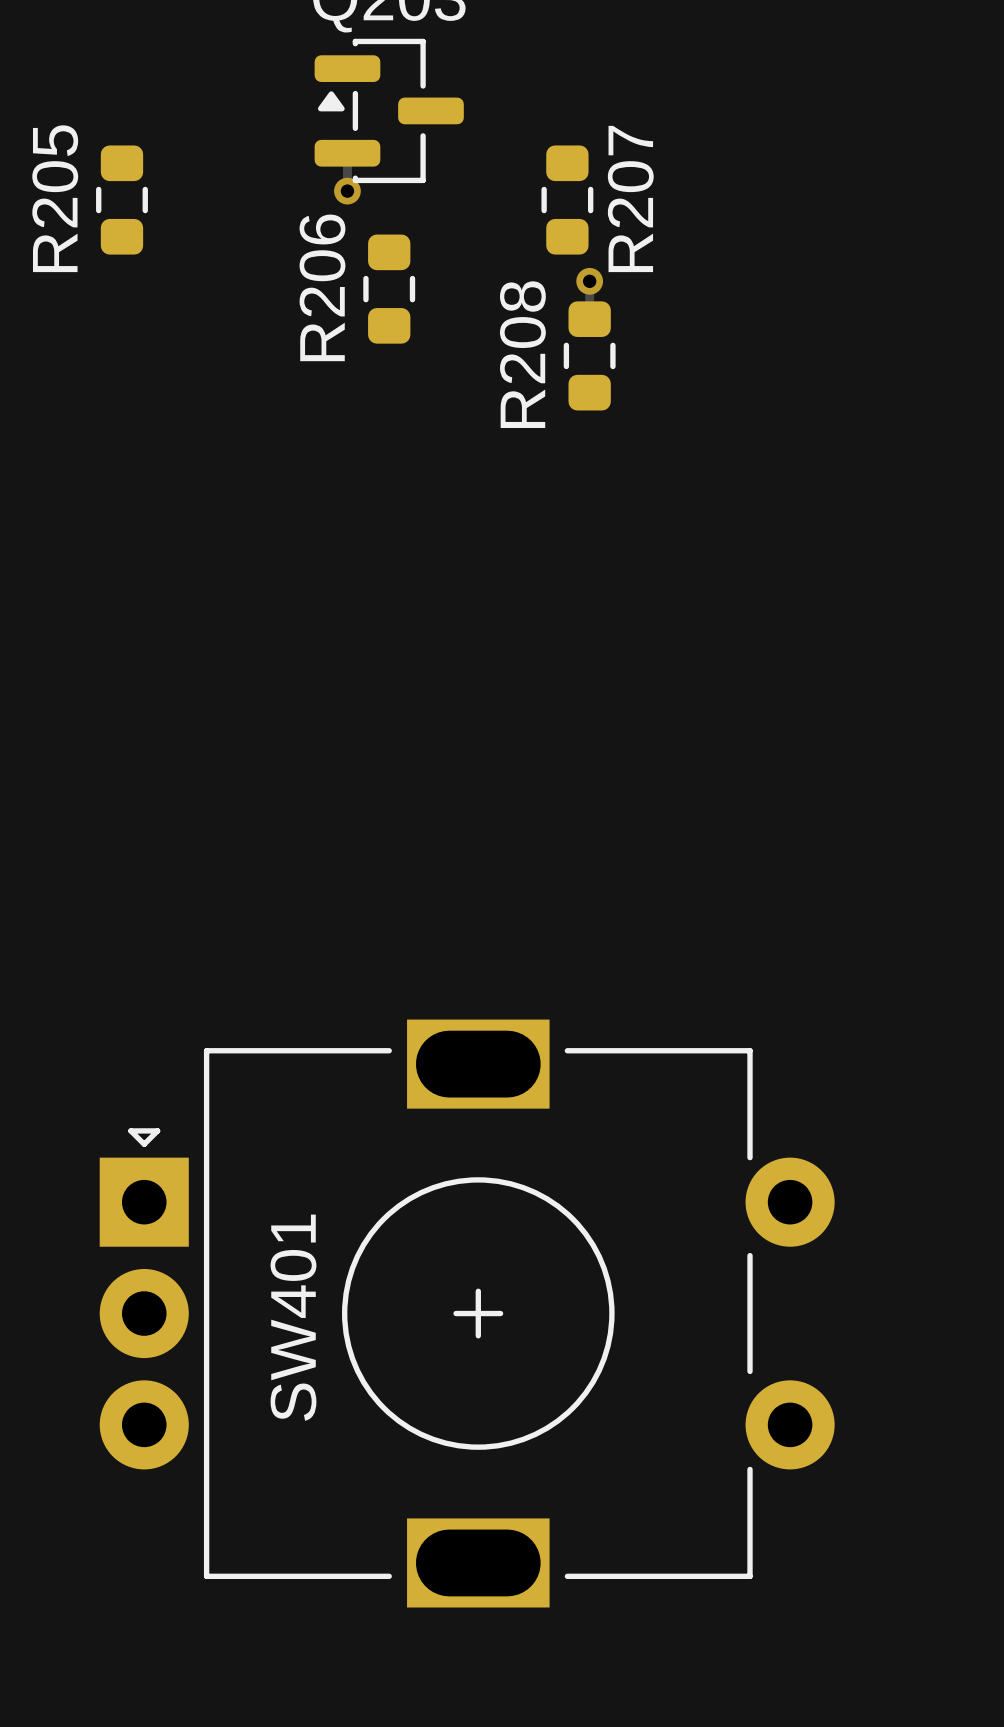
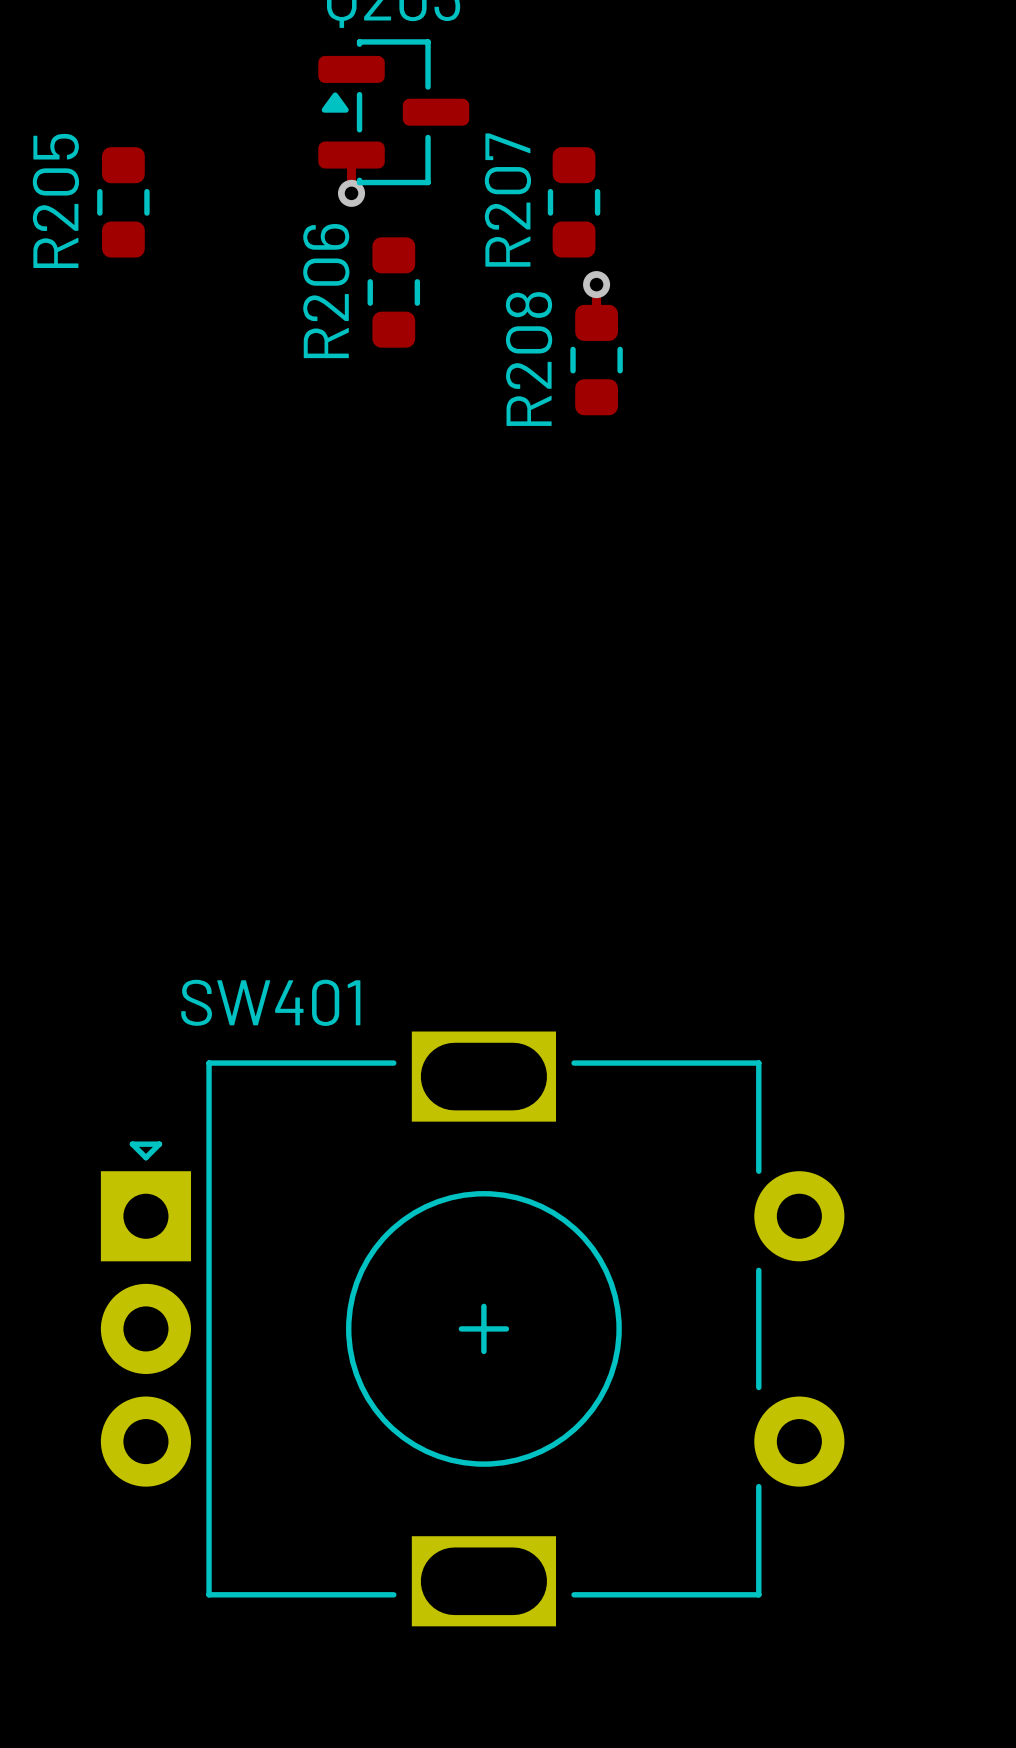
R207 name position: R207 (630, 198) -> R207 (507, 200)
SW401 name rotation: 0° (293, 1317) -> 90° clockwise (270, 1002)
SW401 name position: SW401 (293, 1317) -> SW401 (270, 1002)

